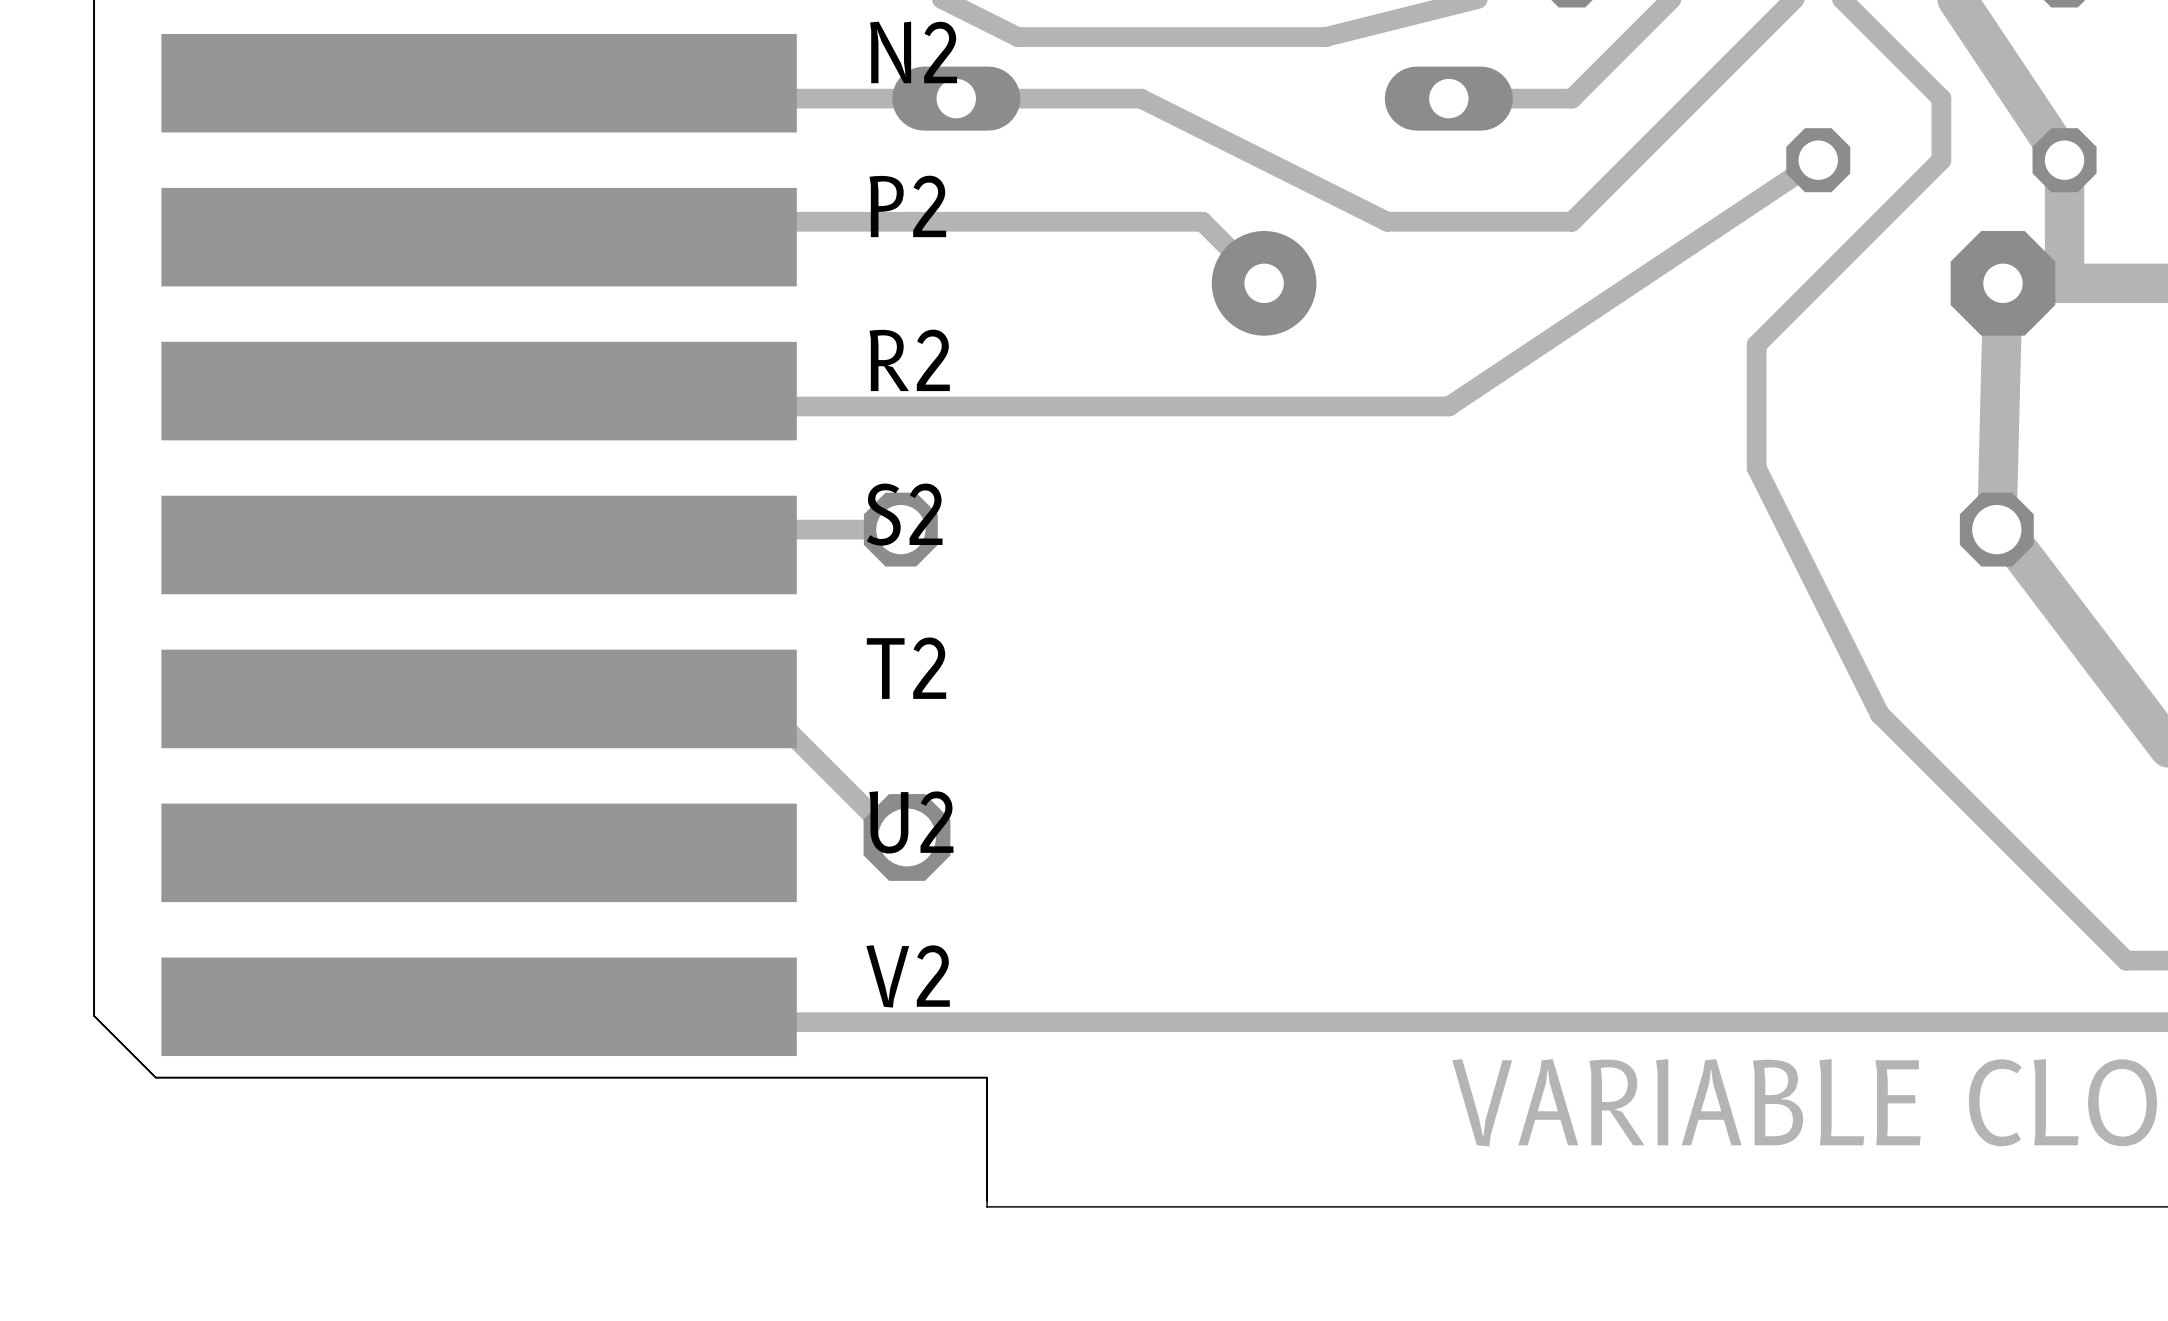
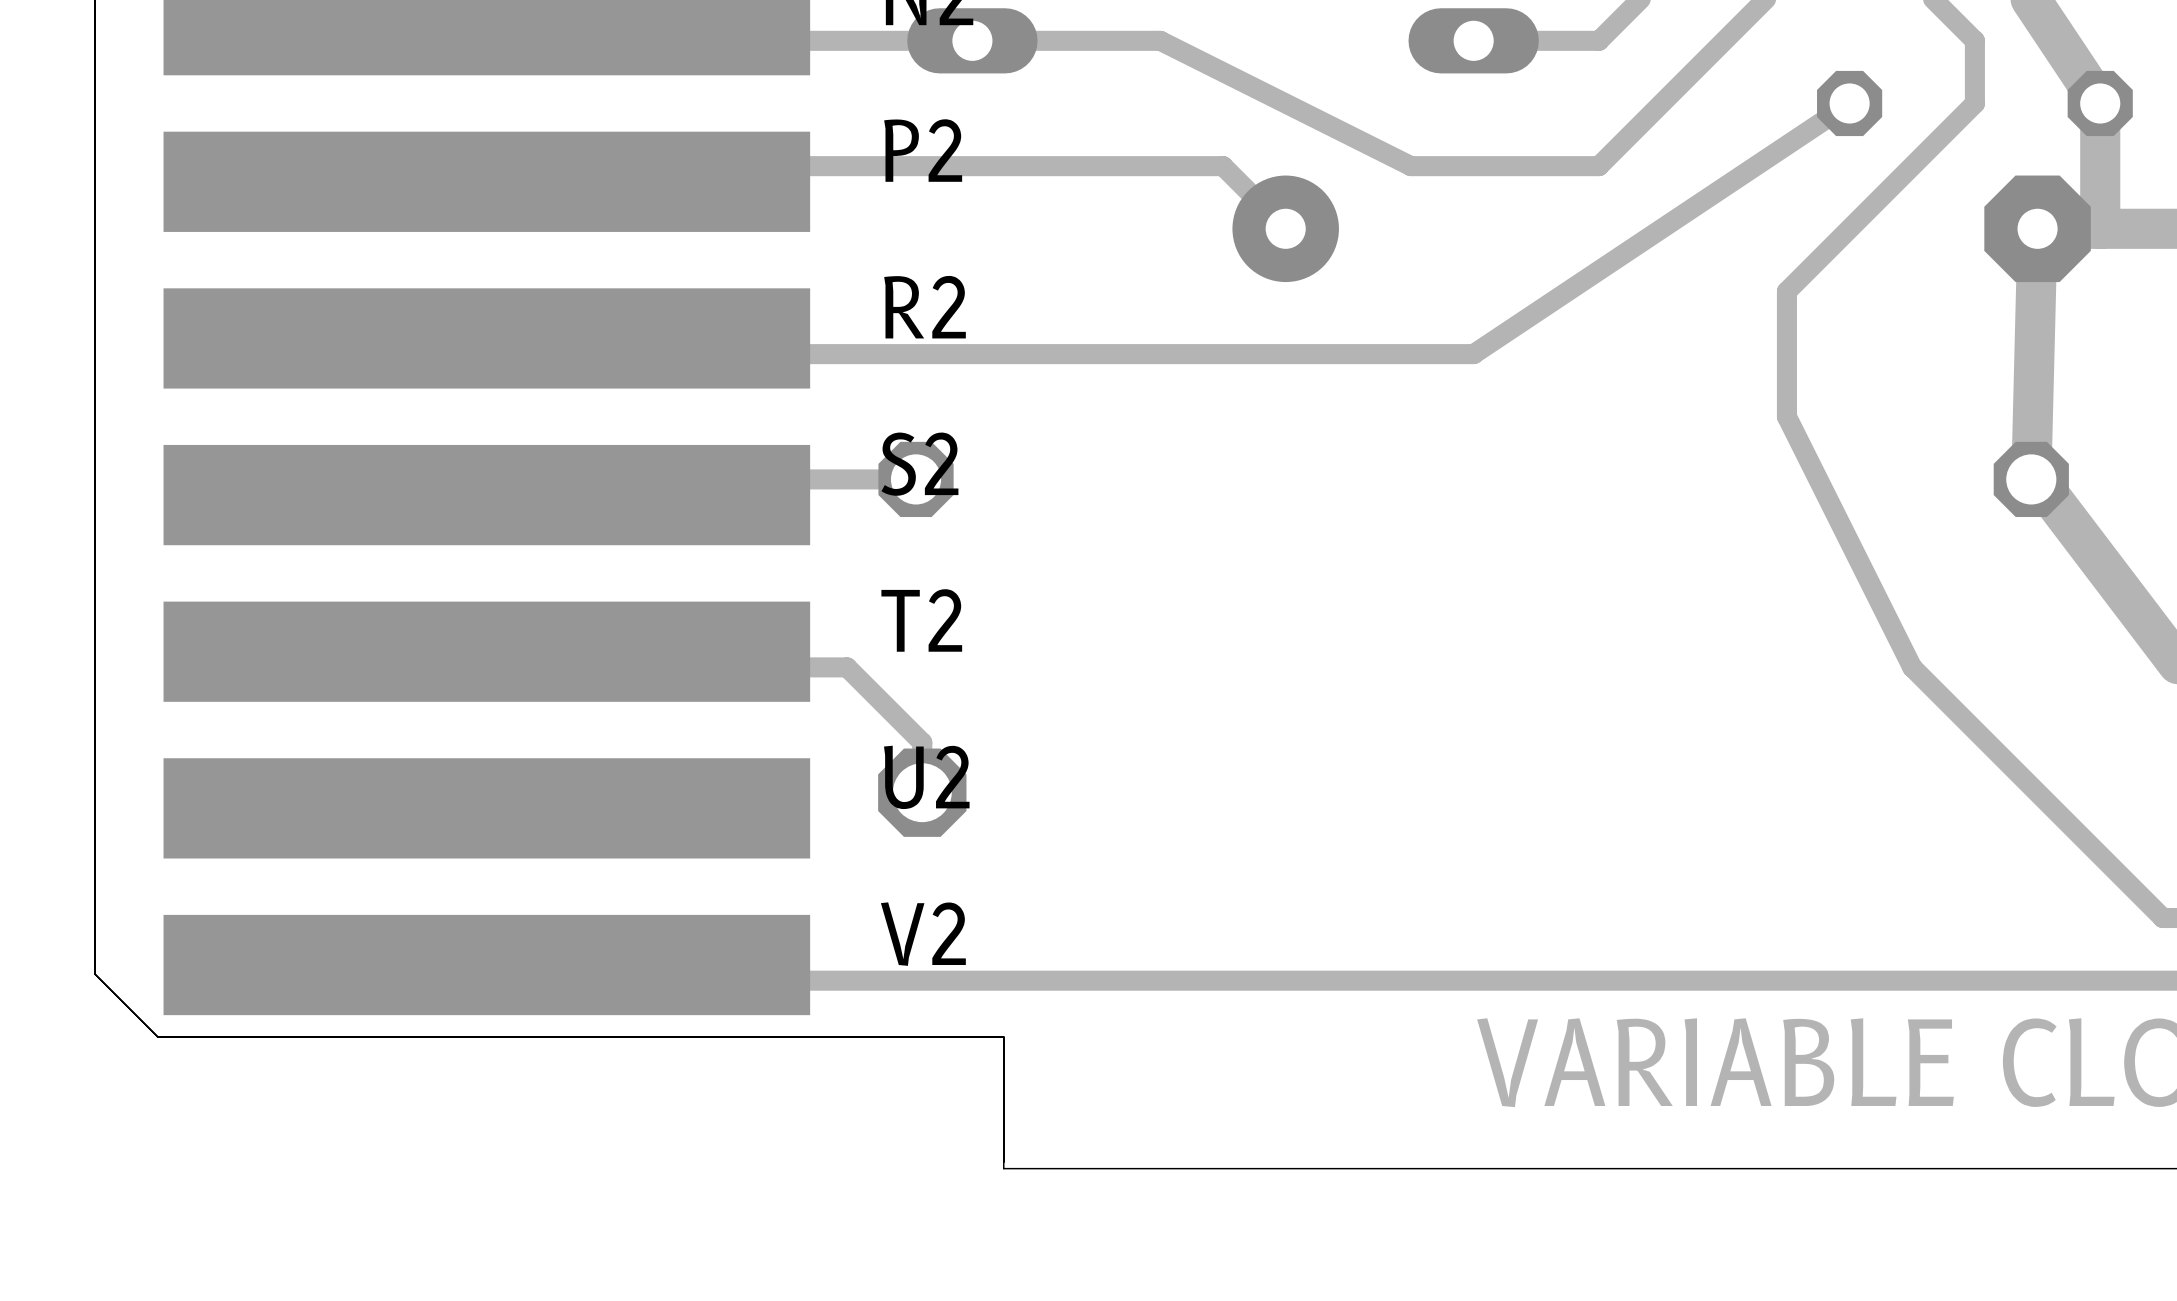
track: (771, 714) (894, 837) (907, 837) -> (784, 667) (847, 667) (922, 742) (922, 792)

